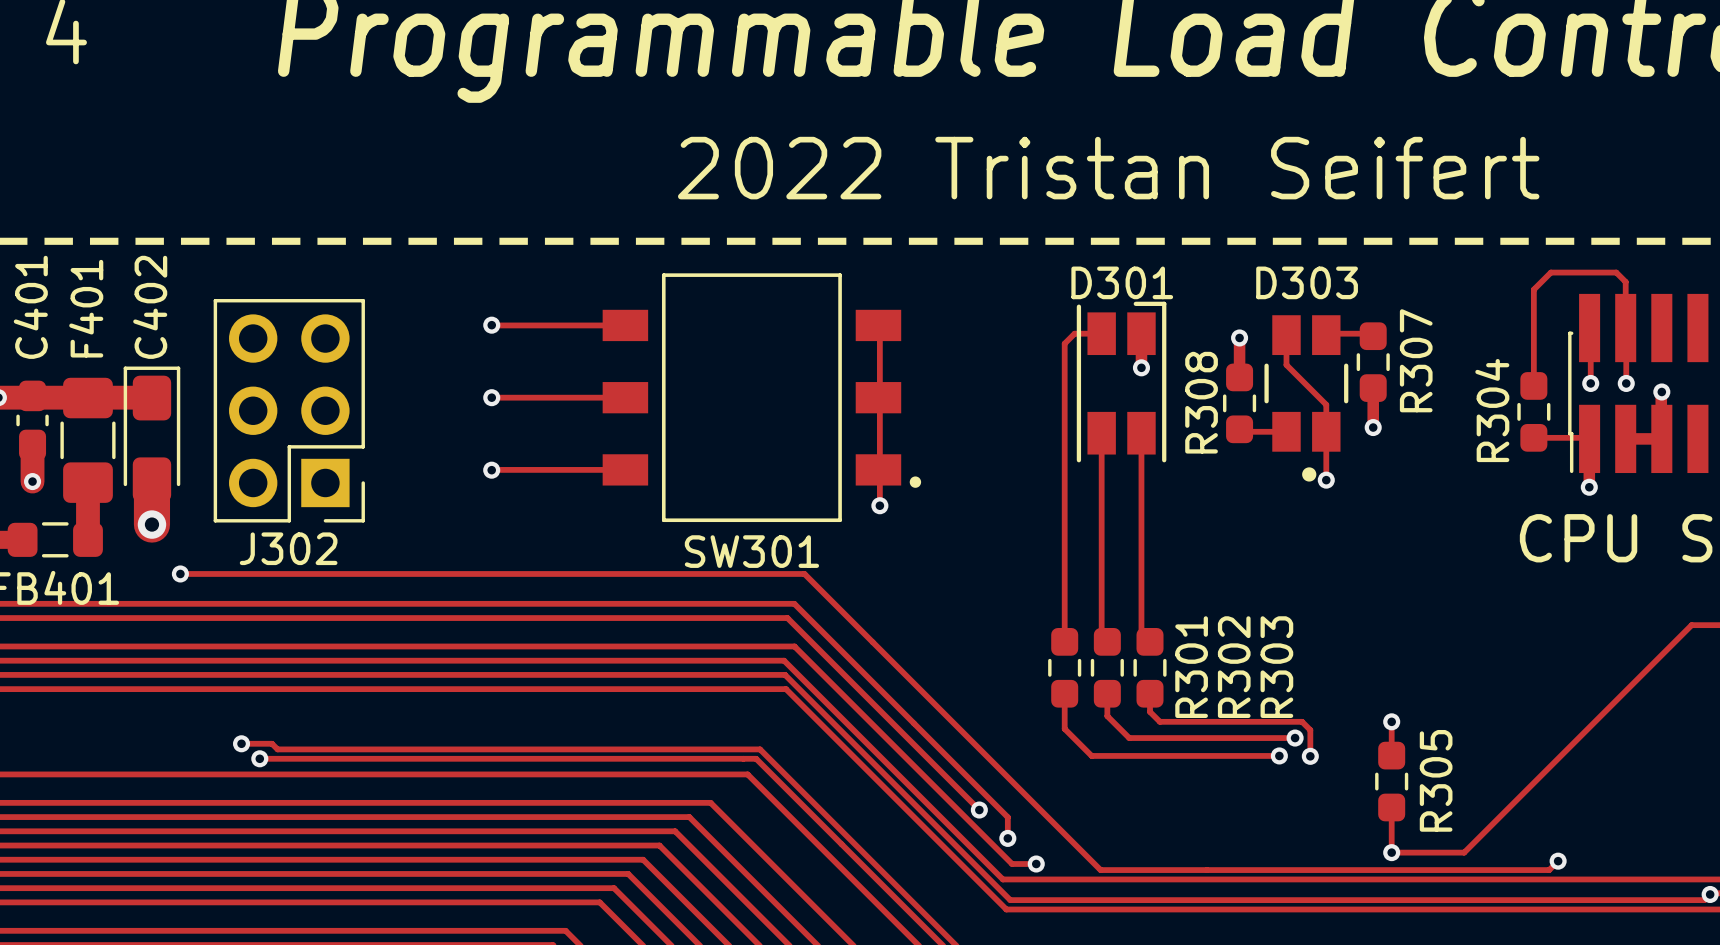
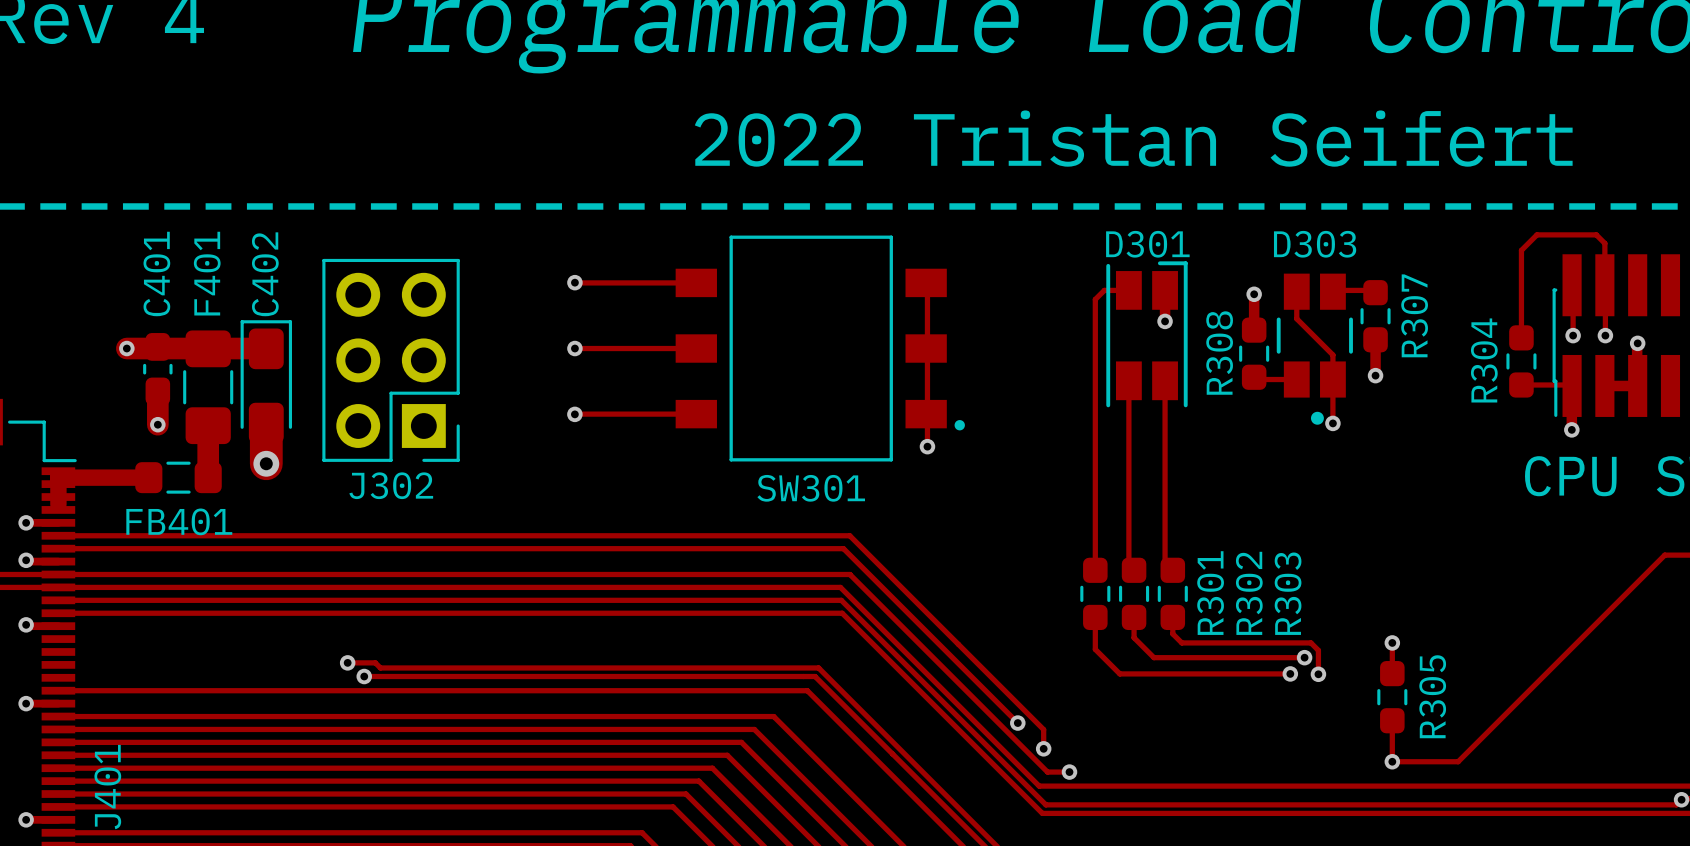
track: (180, 573) (804, 573) (1100, 870) (1549, 870) (1558, 861) -> none
via: (180, 573) -> none
via: (1558, 861) -> none

